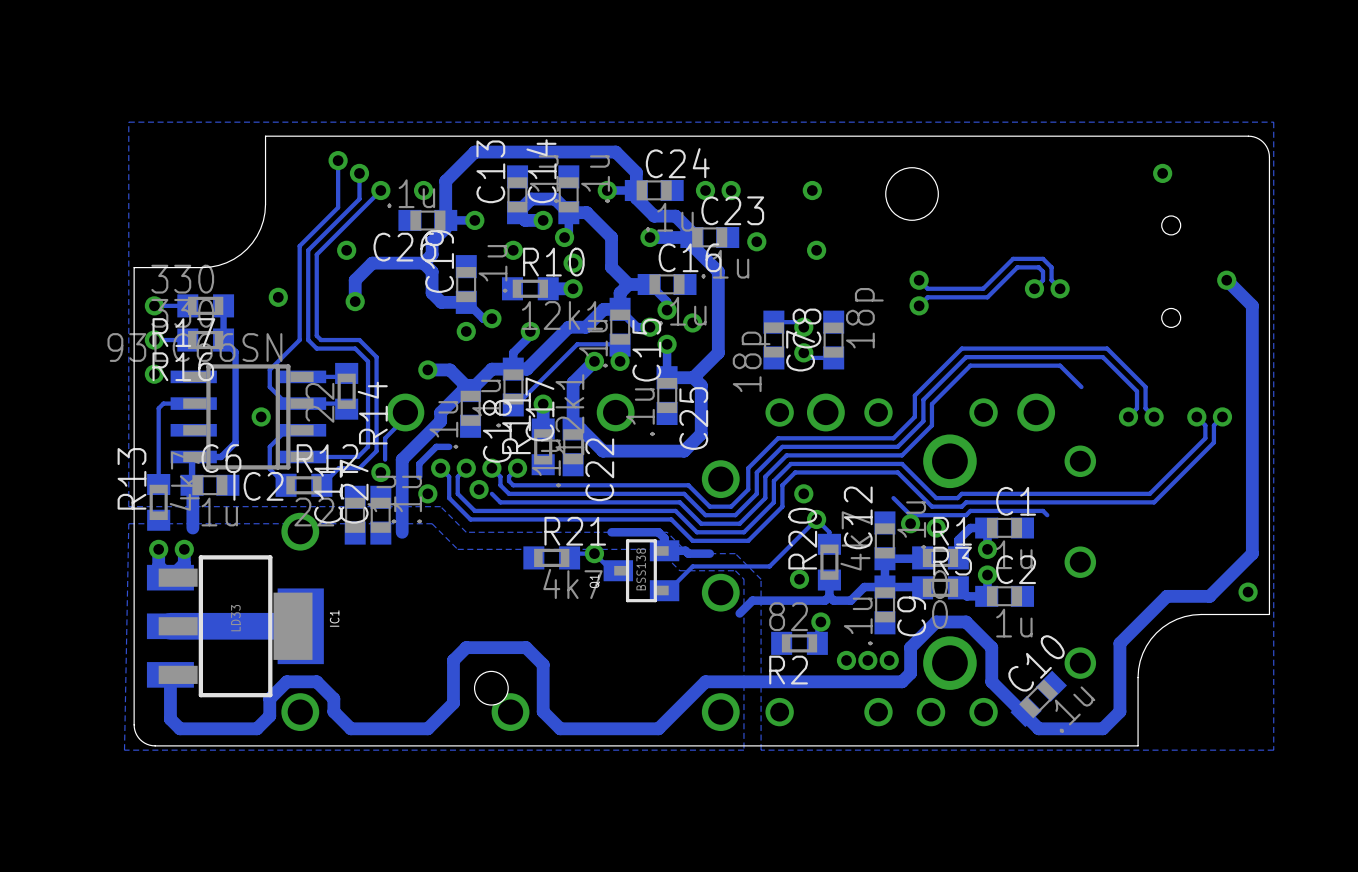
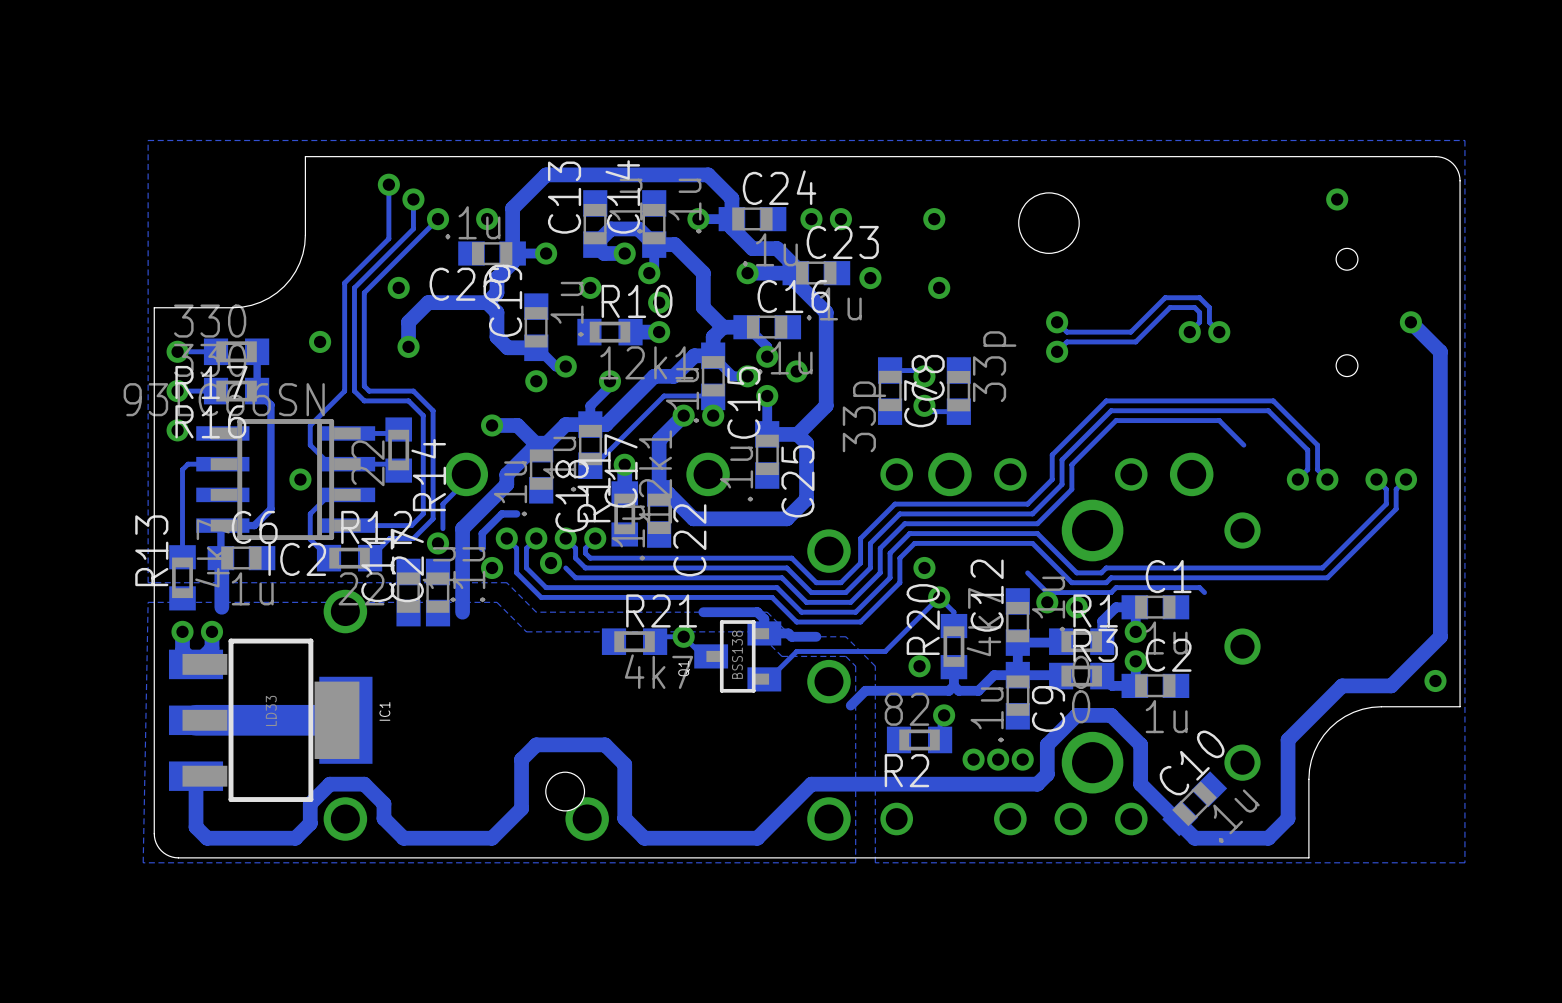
C8 value: 18p (864, 318) -> 33p (994, 366)
C7 value: 18p (751, 361) -> 33p (864, 416)

